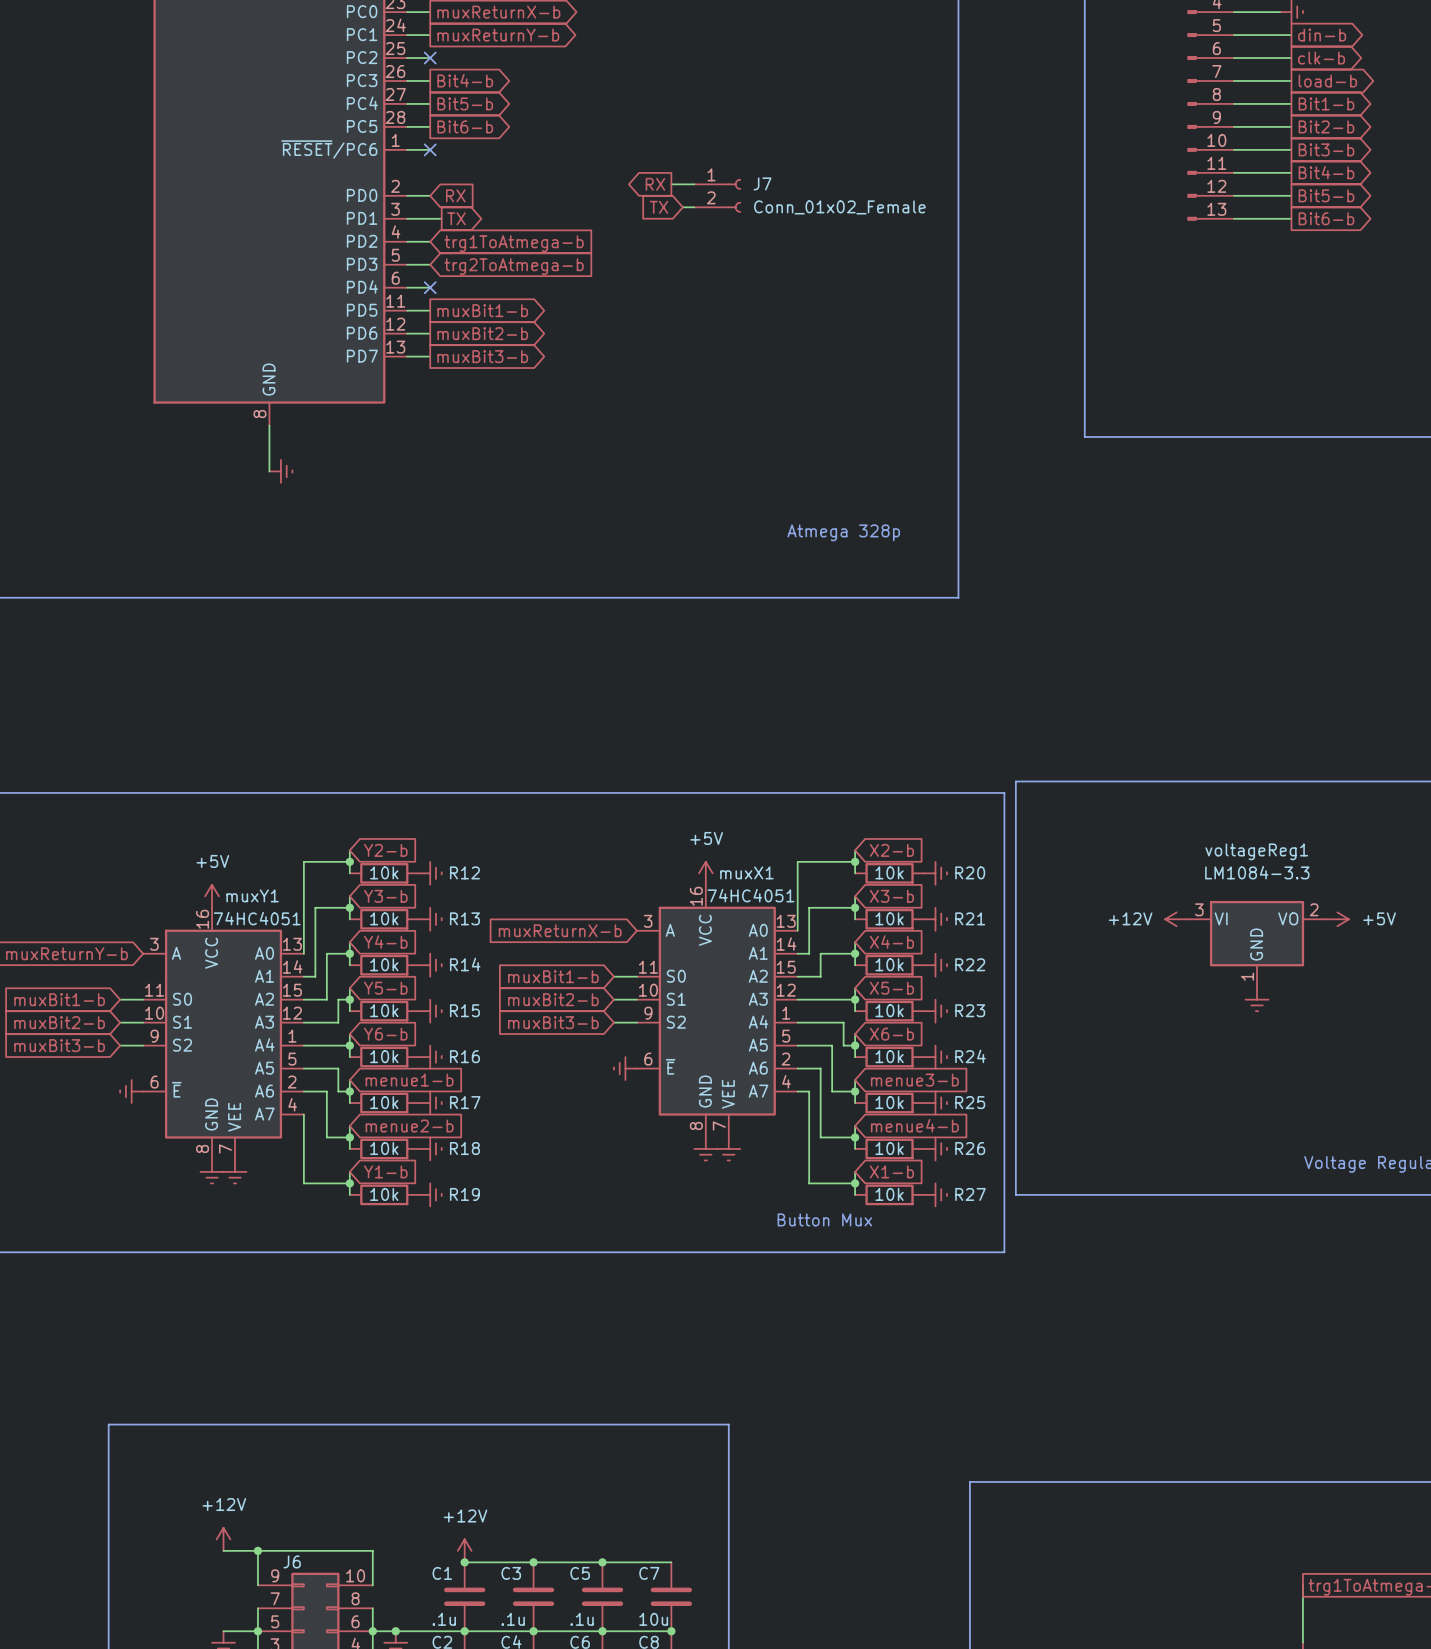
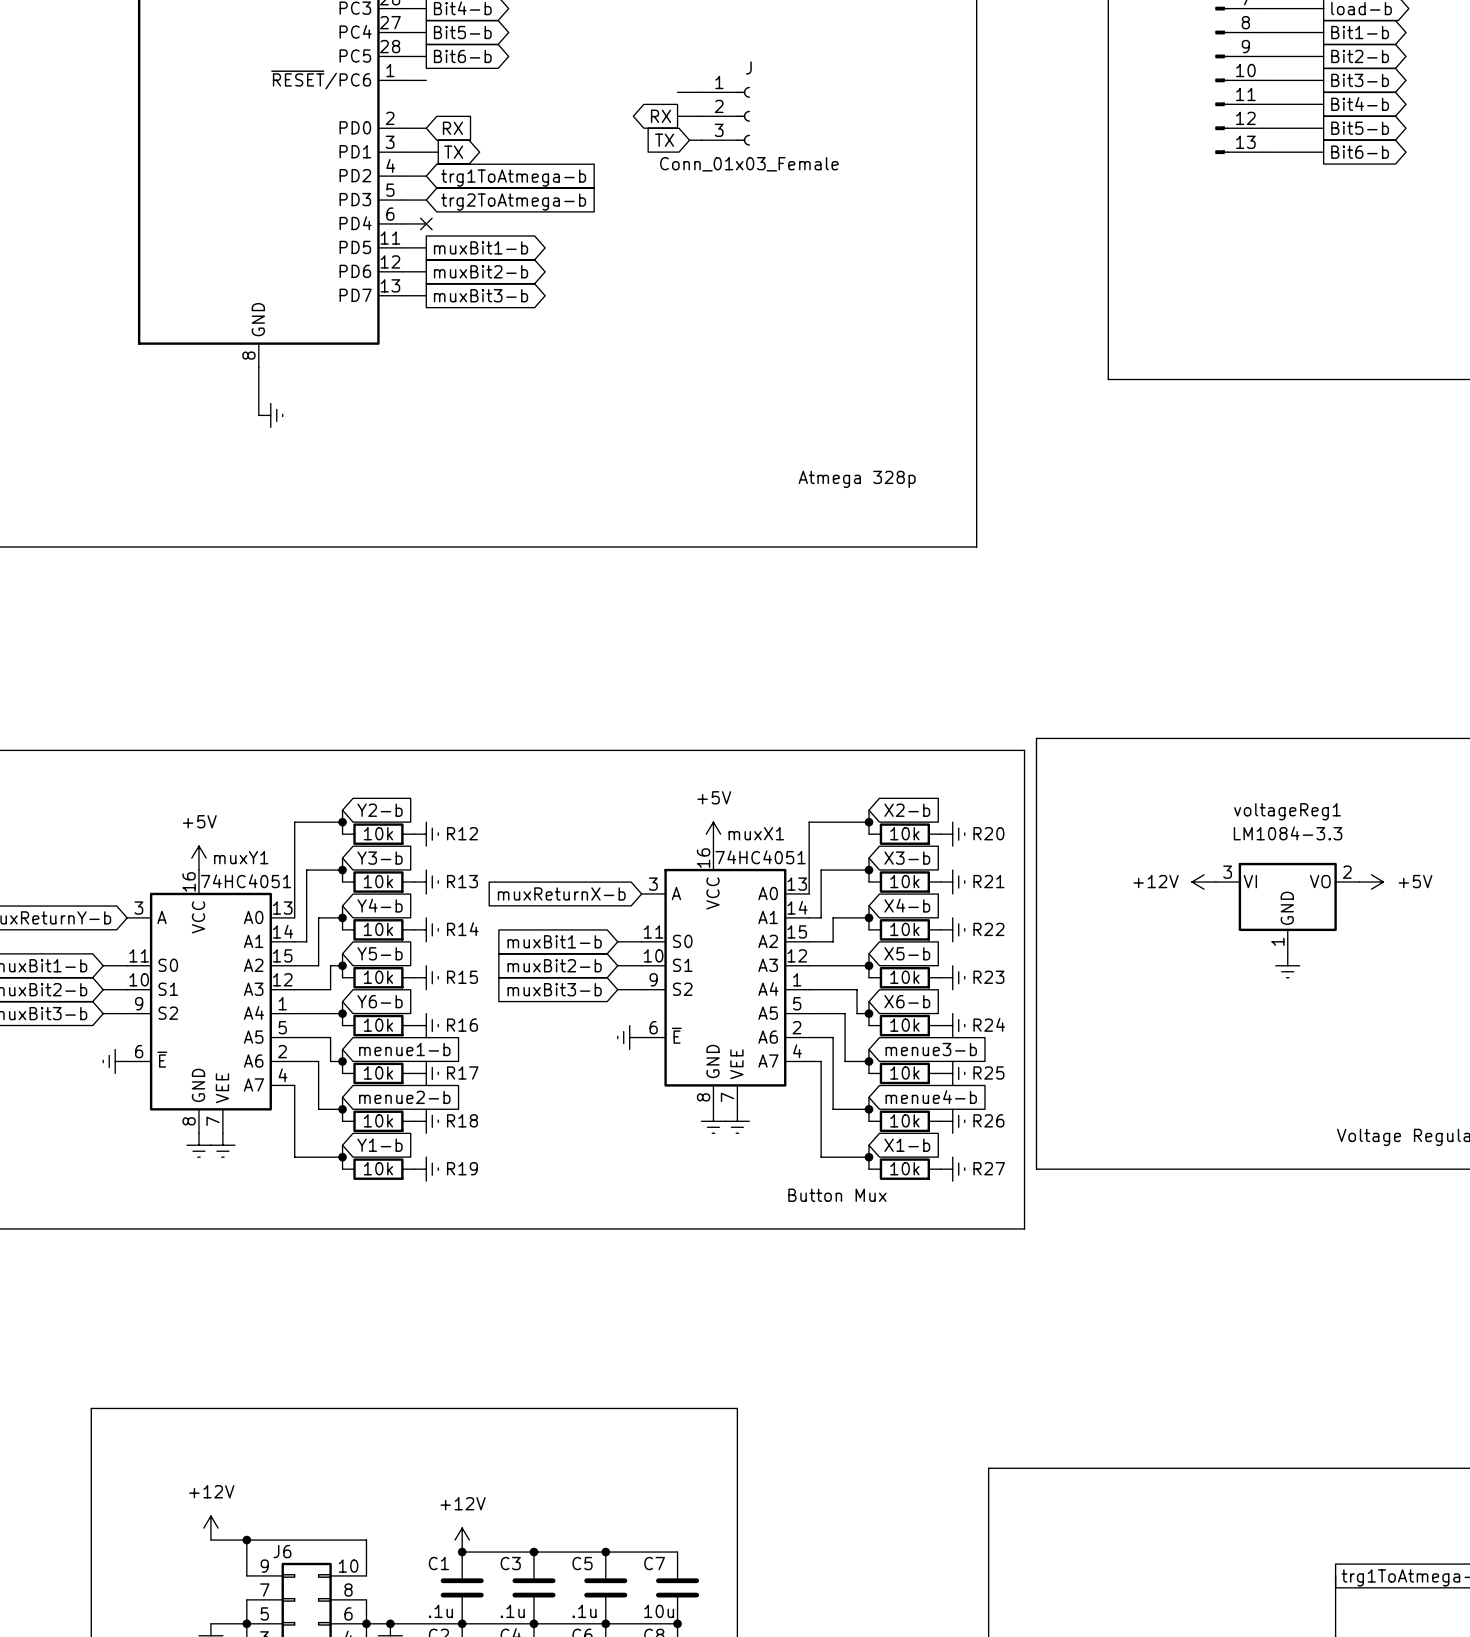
no-connect mark: (430, 149) -> none
wire: none -> (677, 92) (701, 92)
J: none -> Conn_01x03_Female (725, 116)
J7: Conn_01x02_Female (717, 195) -> none

